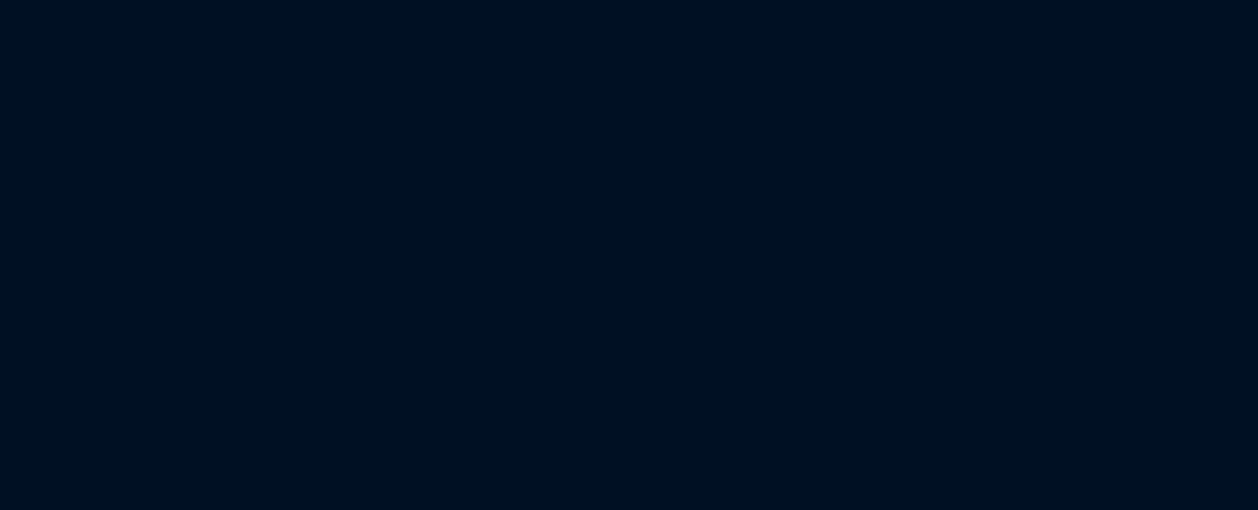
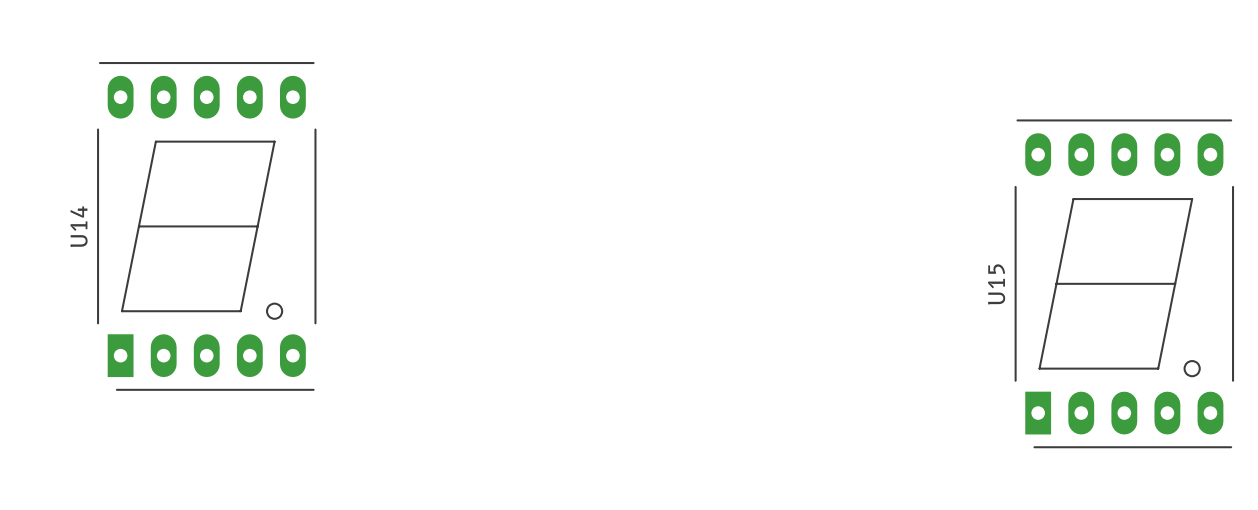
U14: none -> (206, 226)
U15: none -> (1124, 283)

